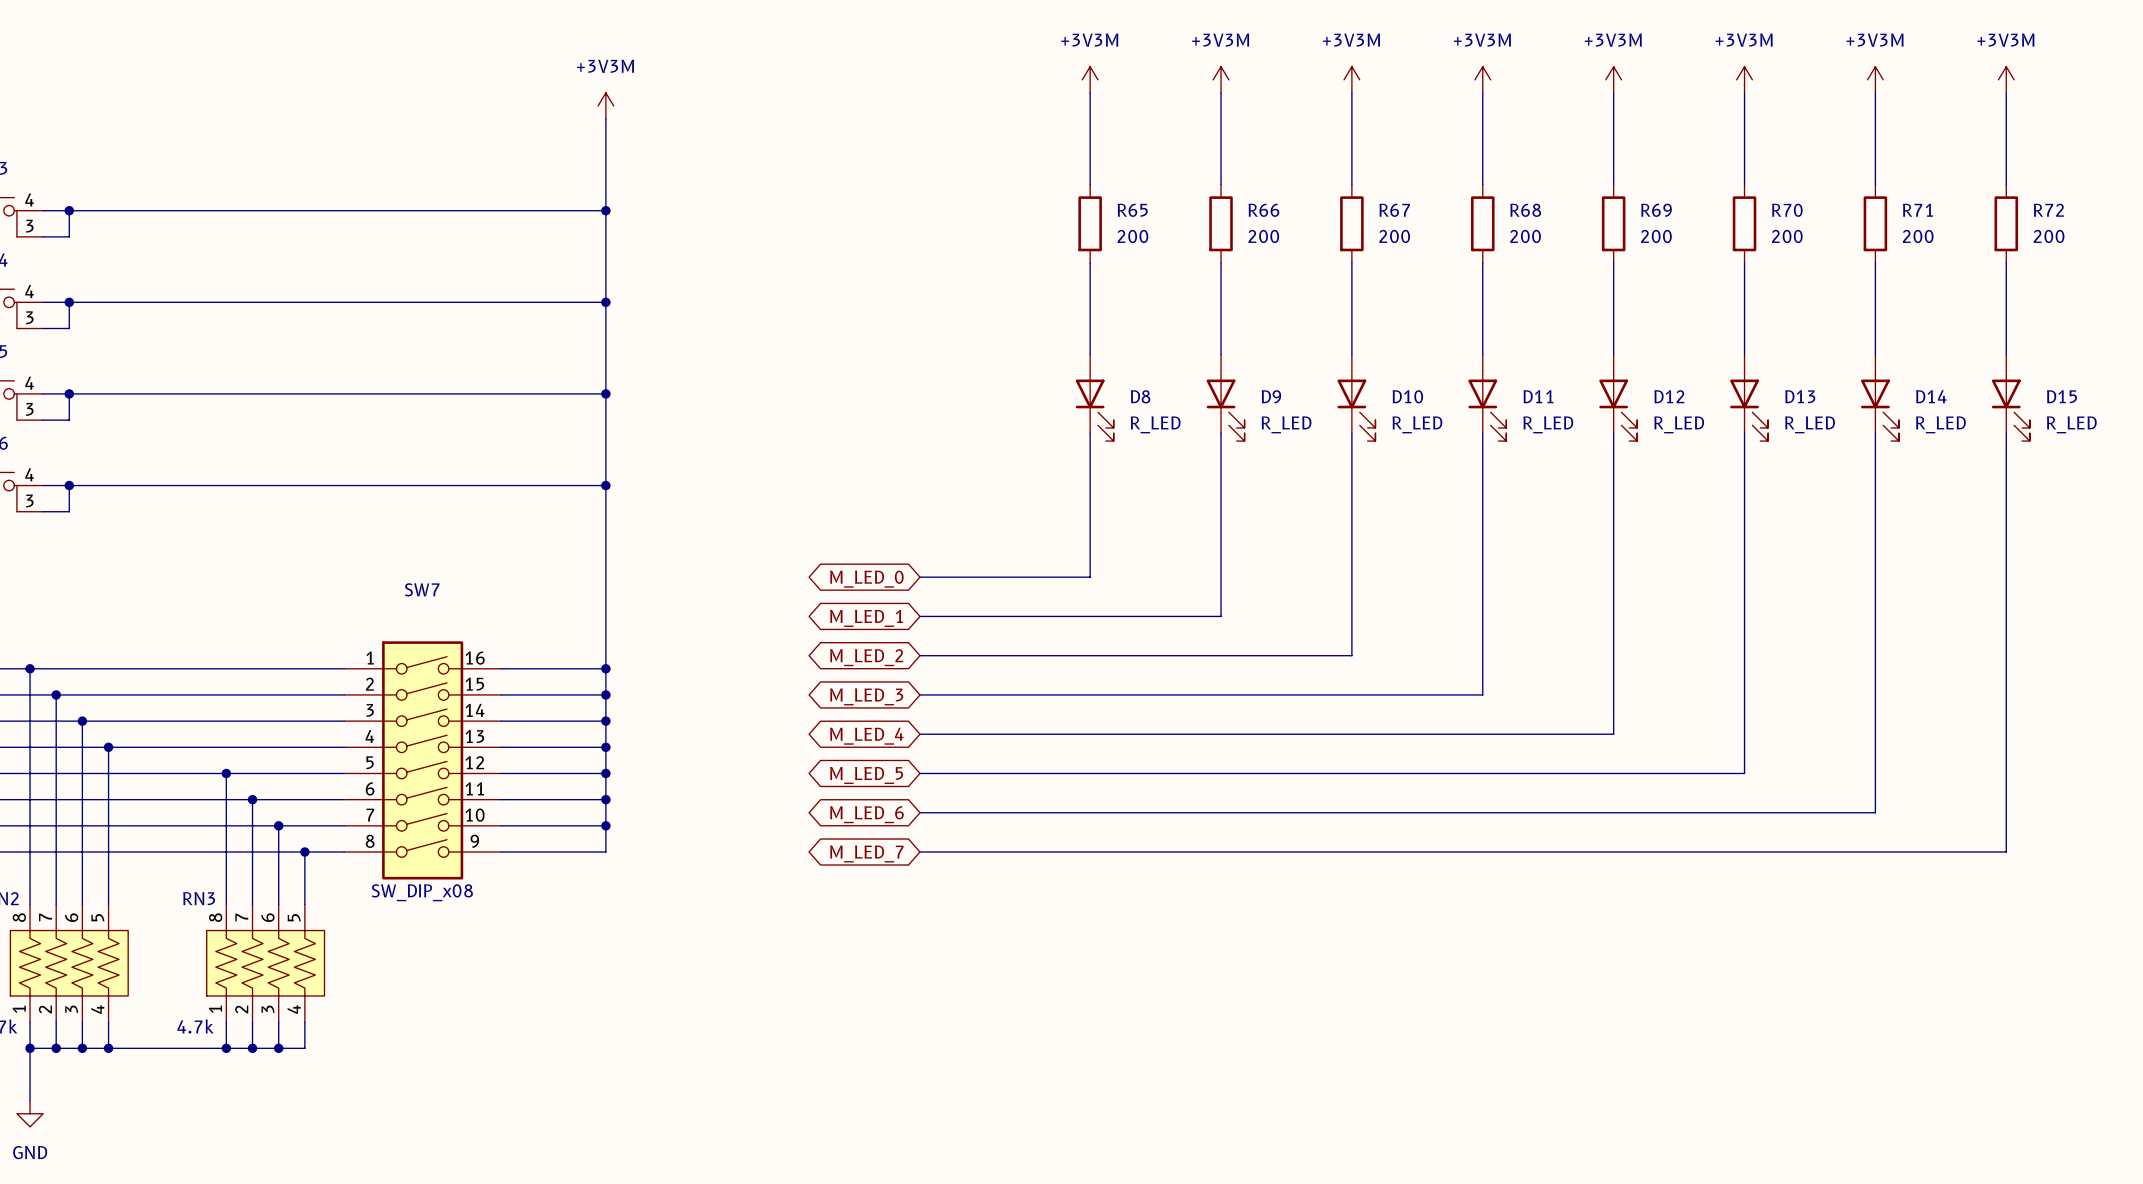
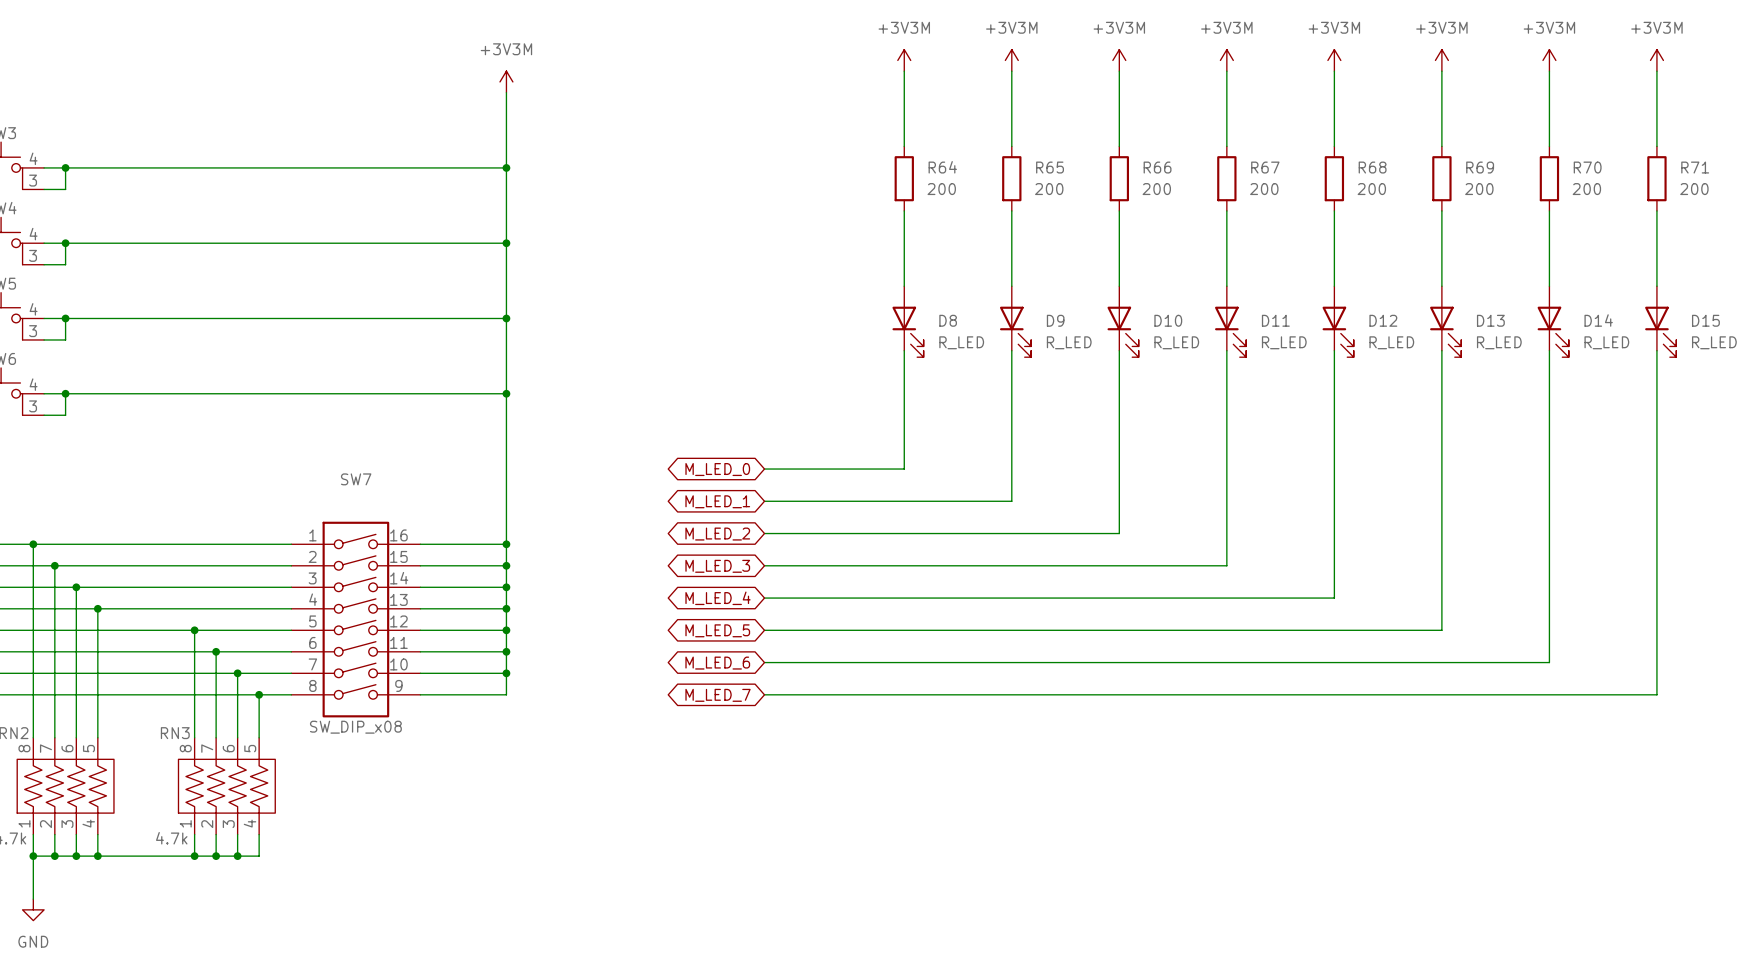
R65 name: R65 (1132, 210) -> R64 (942, 167)
R66 name: R66 (1263, 210) -> R65 (1050, 167)
R67 name: R67 (1394, 210) -> R66 (1157, 167)
R68 name: R68 (1525, 210) -> R67 (1265, 167)
R69 name: R69 (1656, 210) -> R68 (1372, 167)
R70 name: R70 (1787, 210) -> R69 (1480, 167)
R71 name: R71 (1917, 210) -> R70 (1587, 167)
R72 name: R72 (2048, 210) -> R71 (1695, 167)

